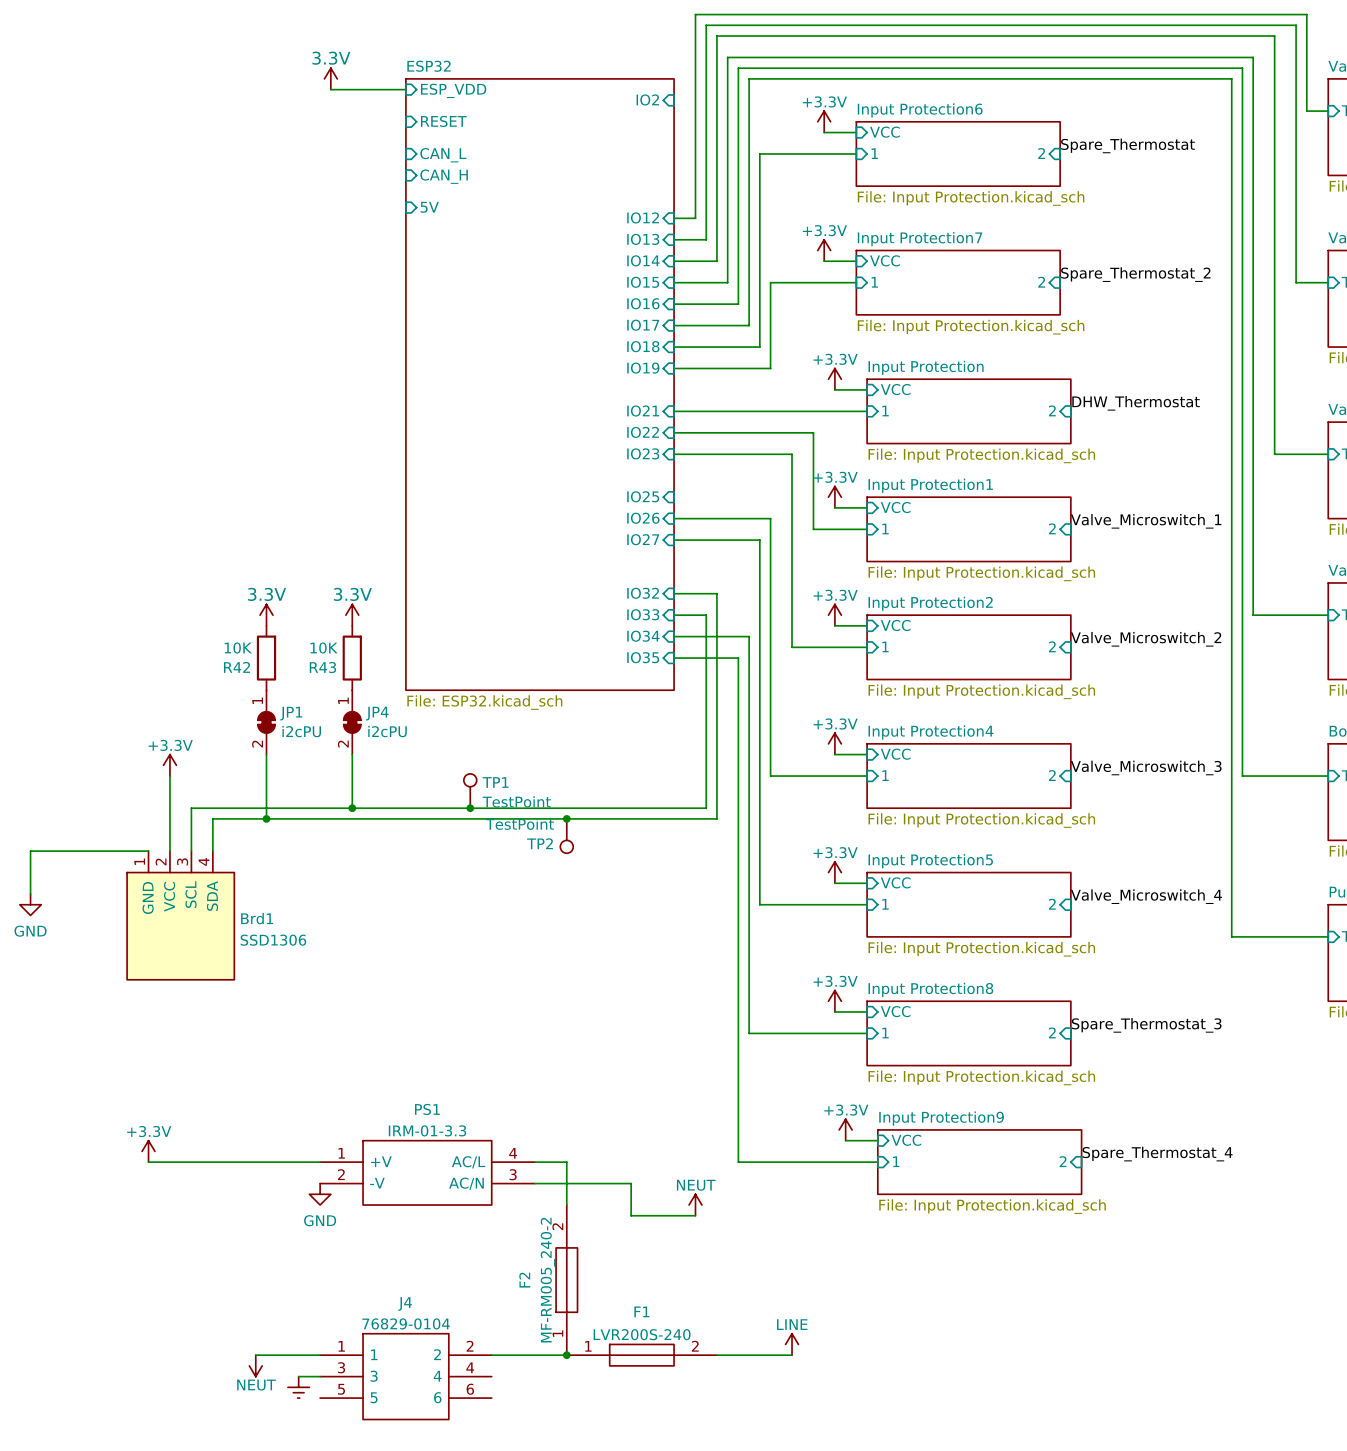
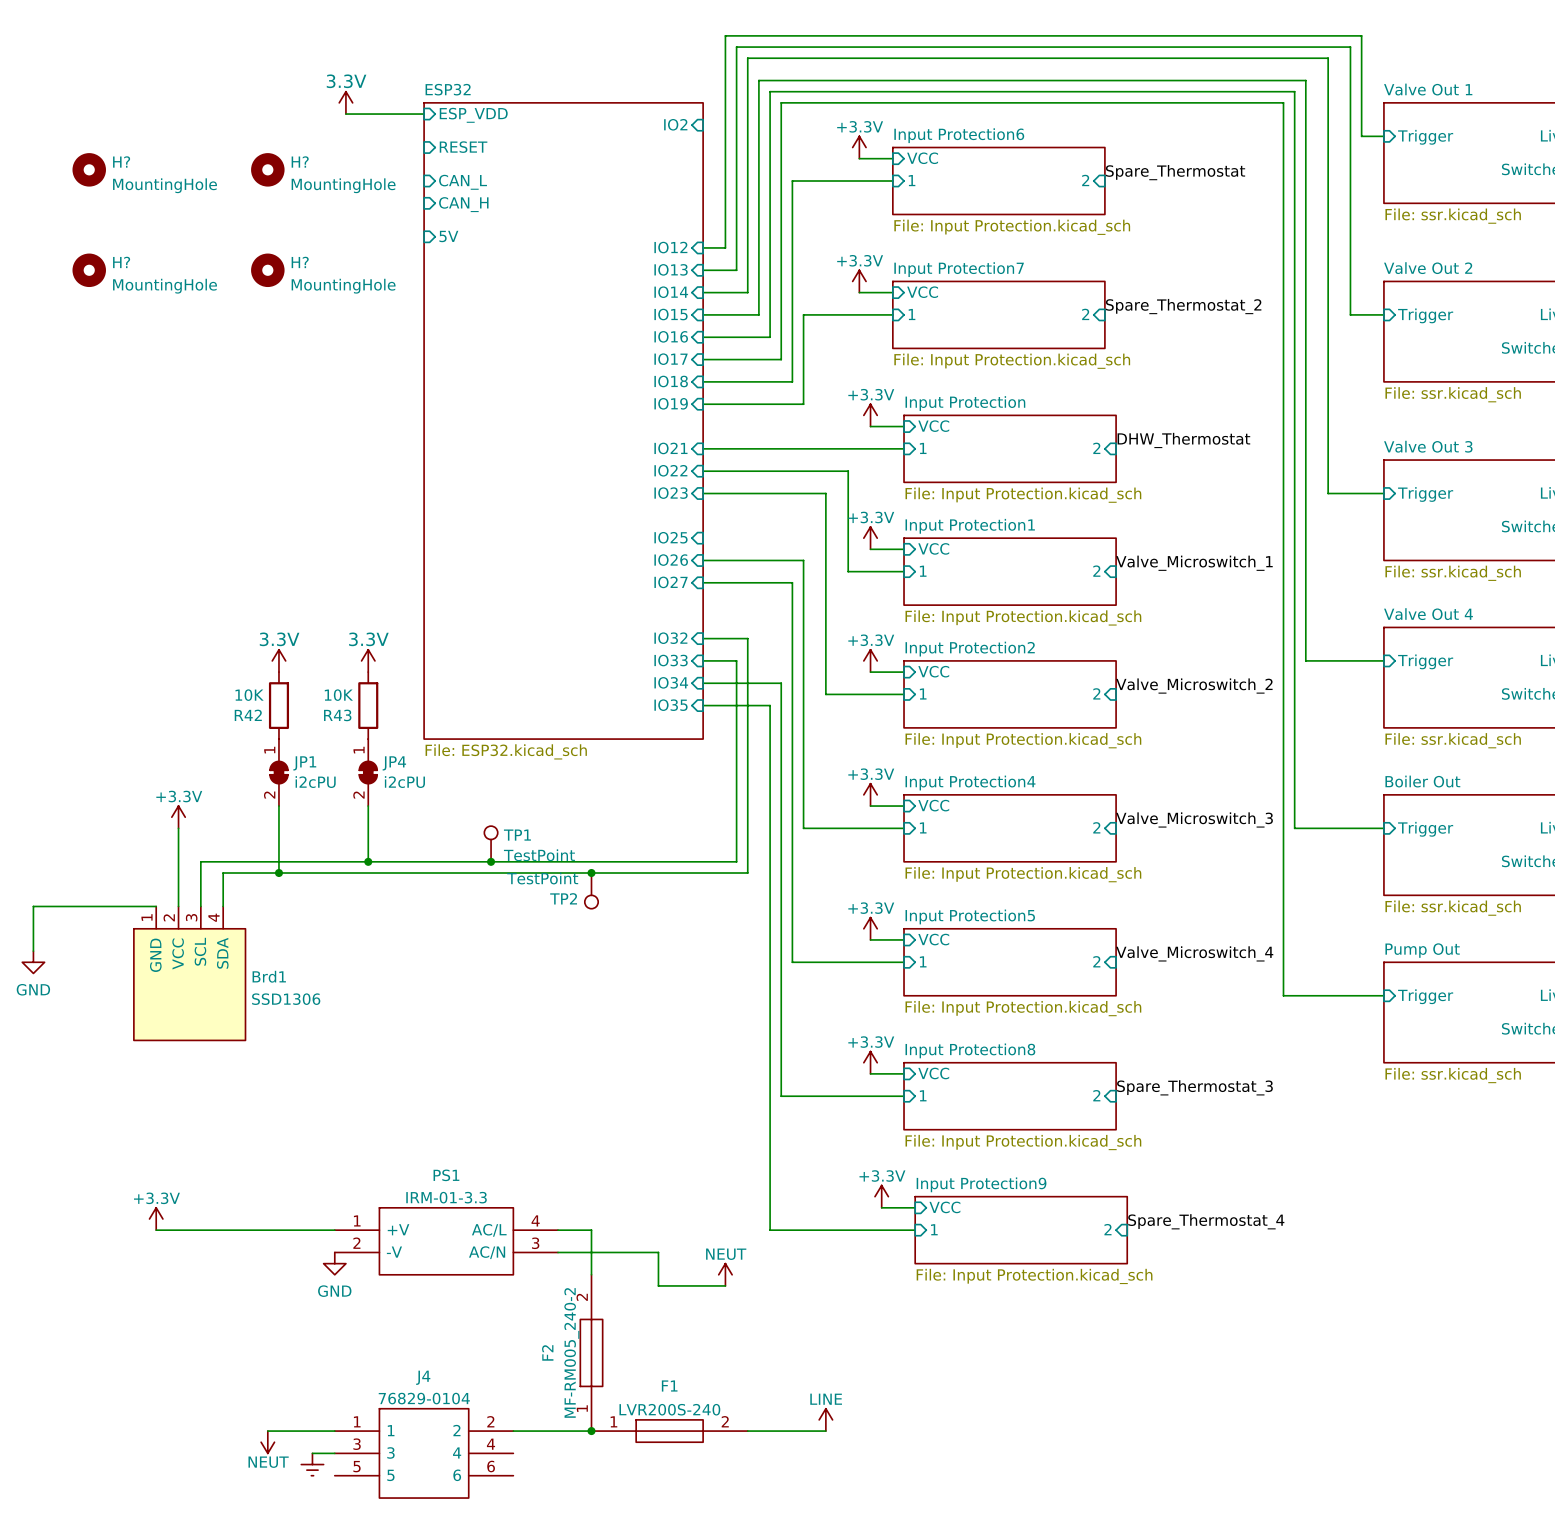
H?: none -> MountingHole (89, 169)
H?: none -> MountingHole (267, 169)
H?: none -> MountingHole (89, 270)
H?: none -> MountingHole (267, 270)

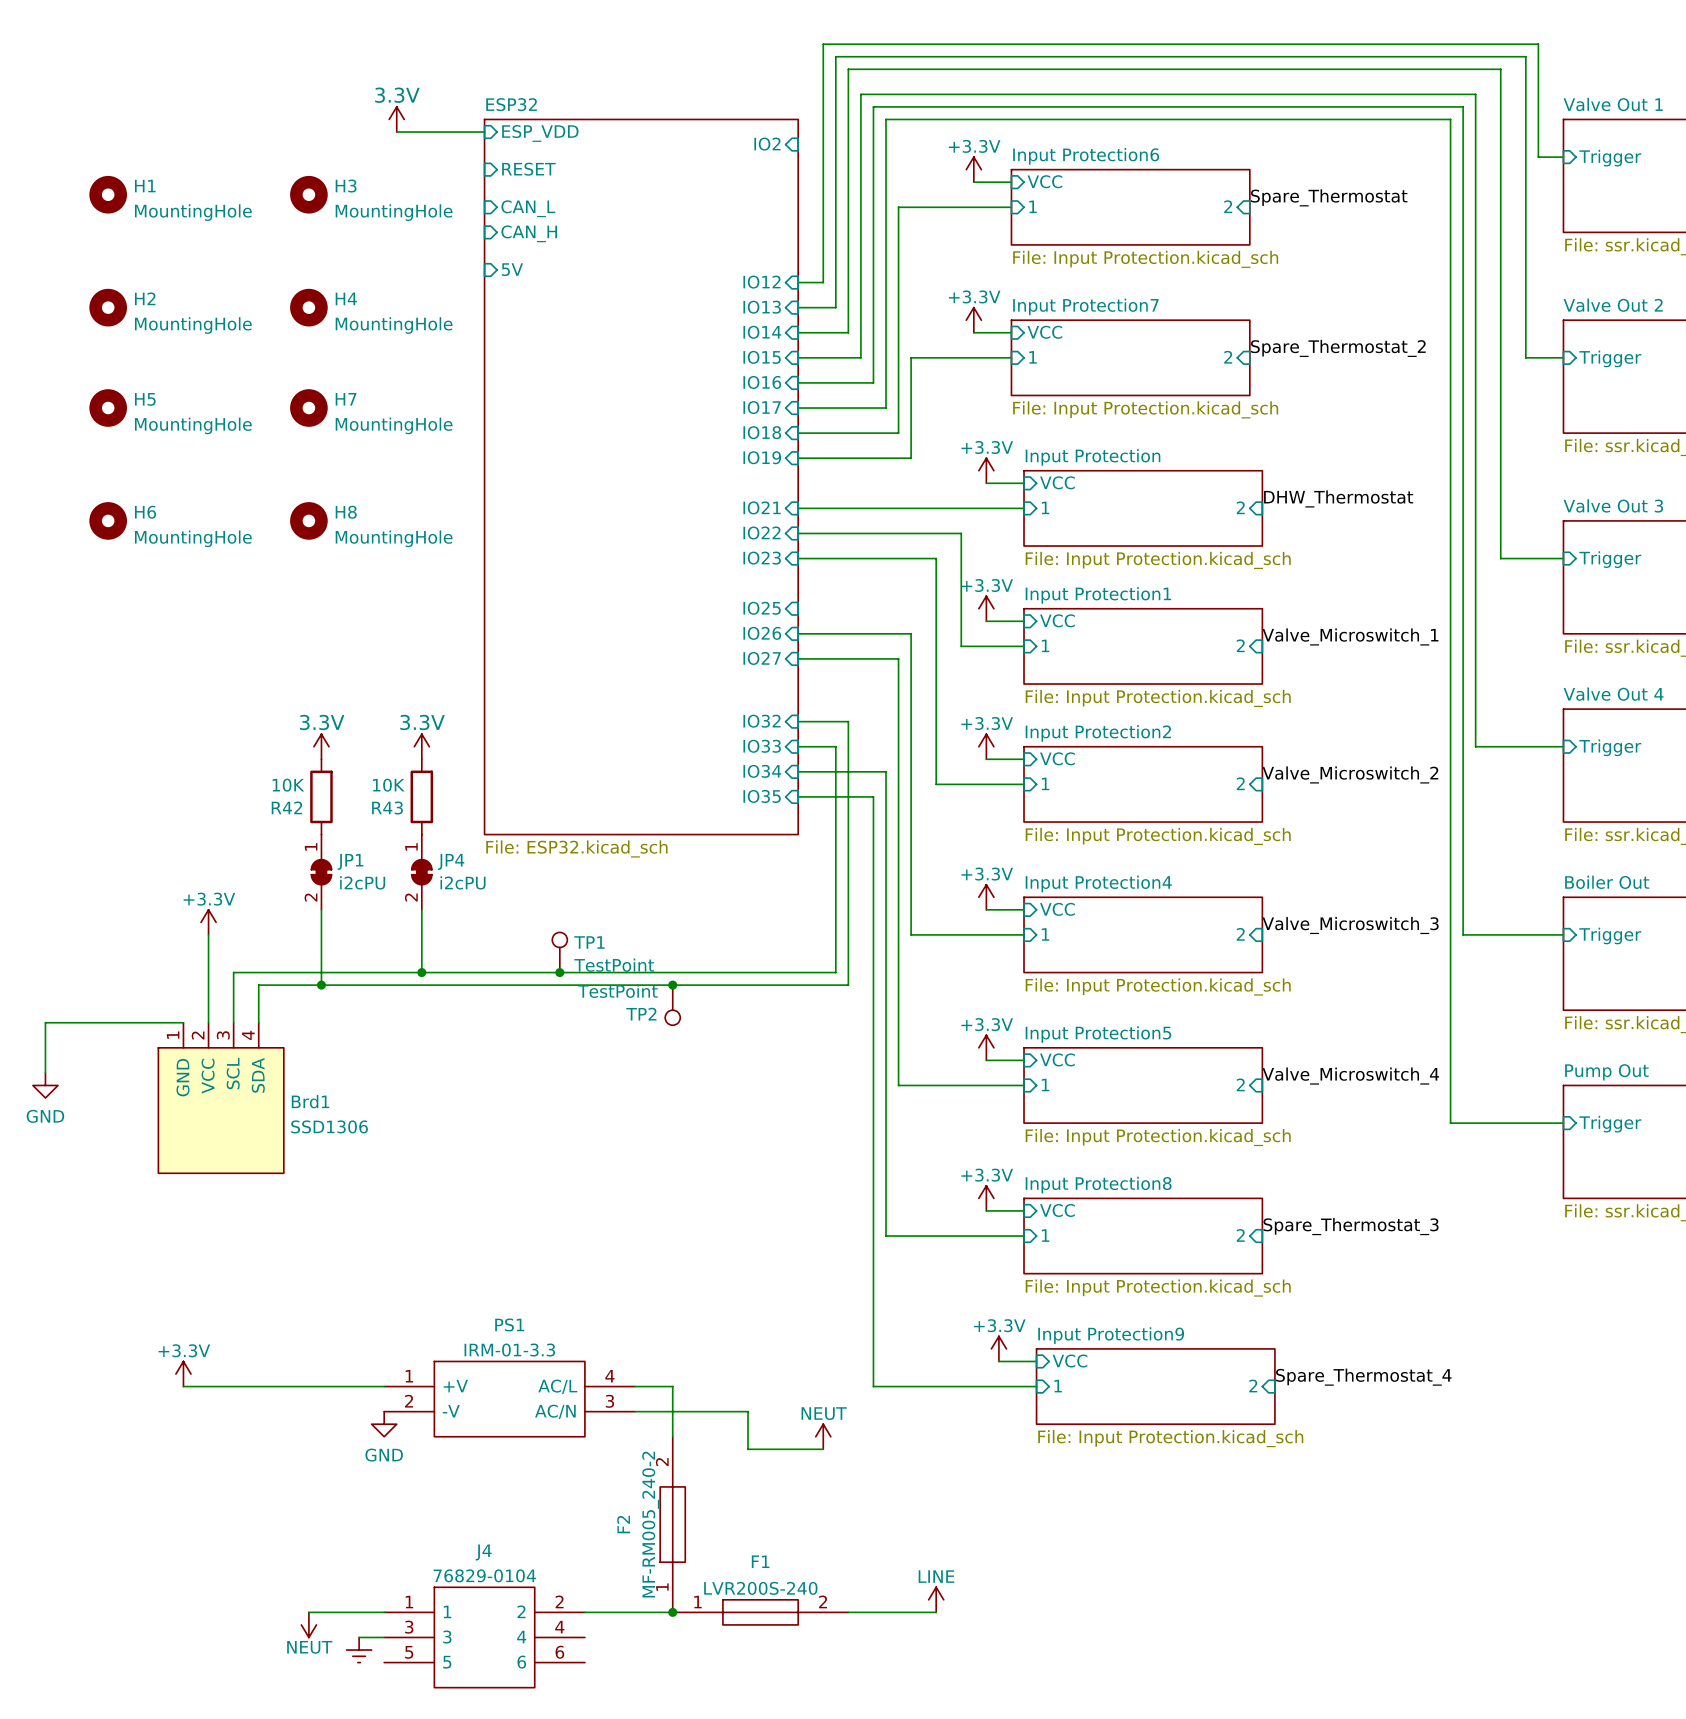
H? name: H? (121, 161) -> H1 (145, 186)
H? name: H? (300, 161) -> H3 (346, 186)
H? name: H? (121, 262) -> H2 (145, 298)
H? name: H? (300, 262) -> H4 (346, 298)
H5: none -> MountingHole (108, 408)
H7: none -> MountingHole (308, 408)
H6: none -> MountingHole (108, 520)
H8: none -> MountingHole (308, 520)

